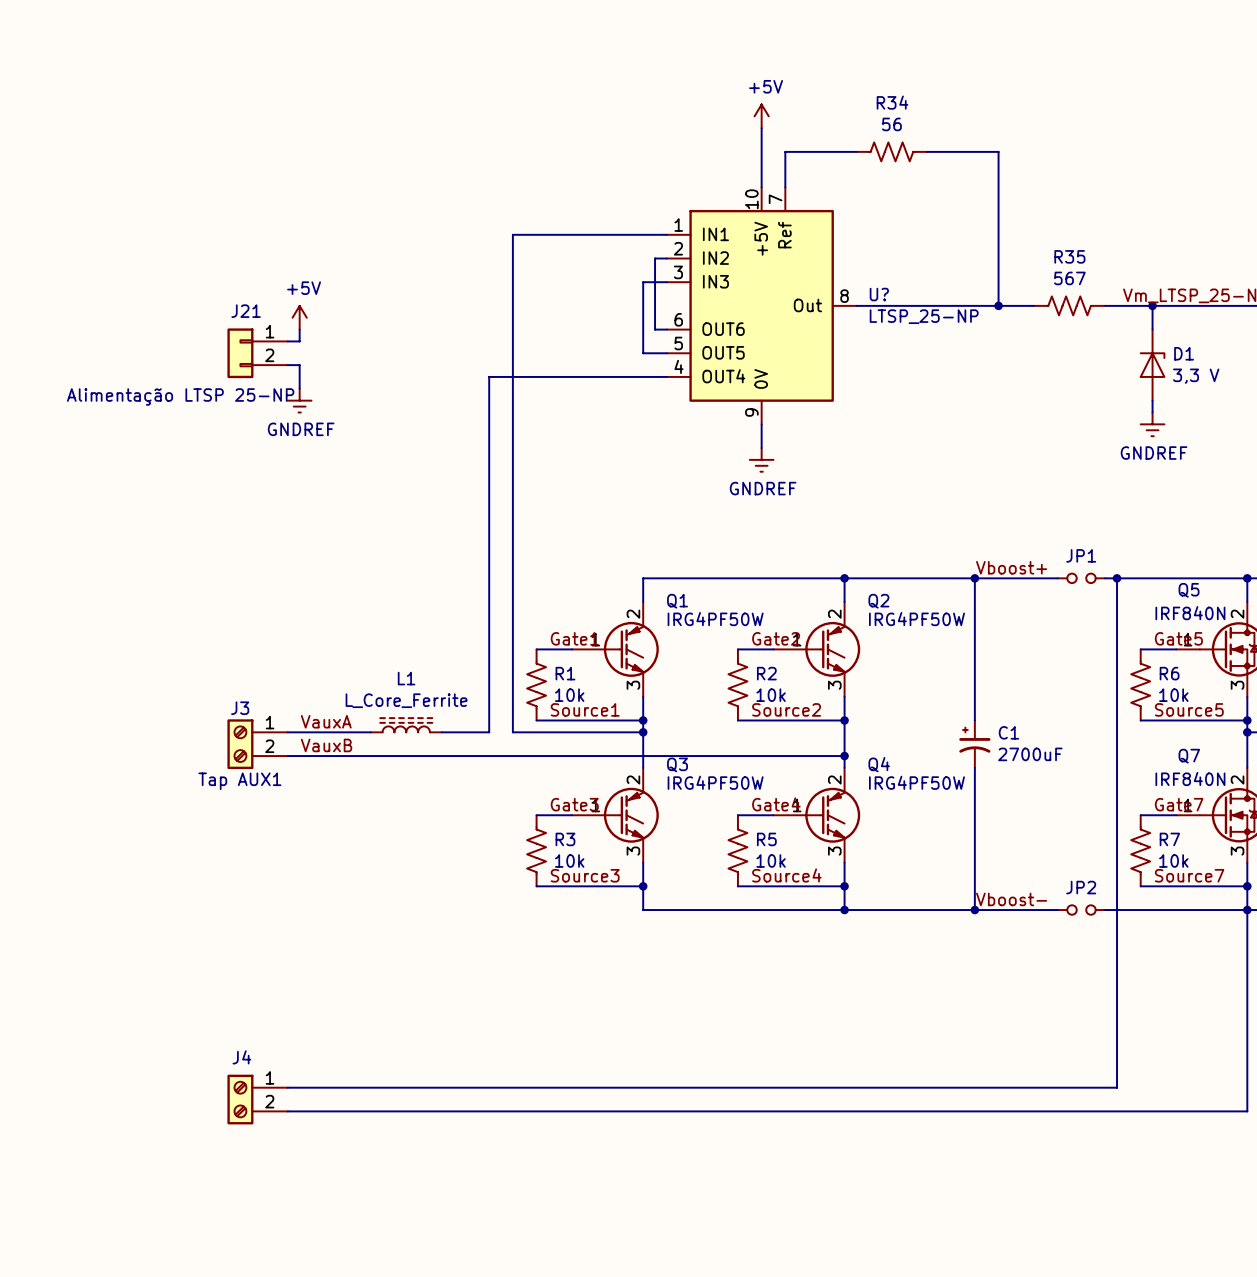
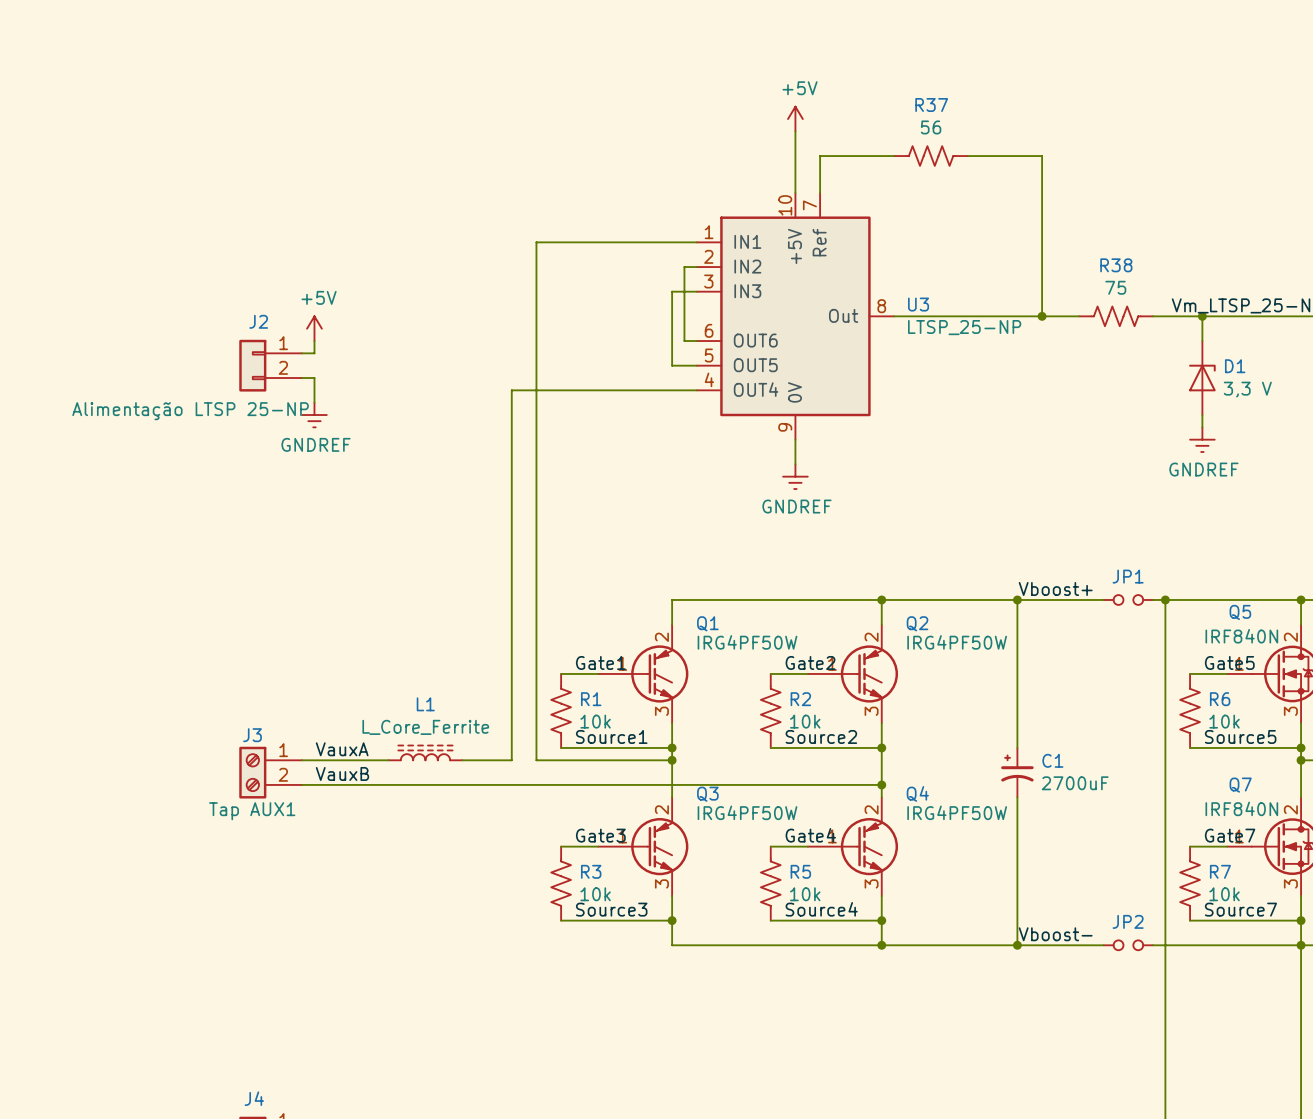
R34 name: R34 (892, 102) -> R37 (931, 105)
R35 name: R35 (1069, 256) -> R38 (1116, 265)
R35 value: 567 (1069, 278) -> 75 (1115, 287)
U? name: U? (879, 294) -> U3 (918, 304)
J21 name: J21 (246, 311) -> J2 (258, 321)

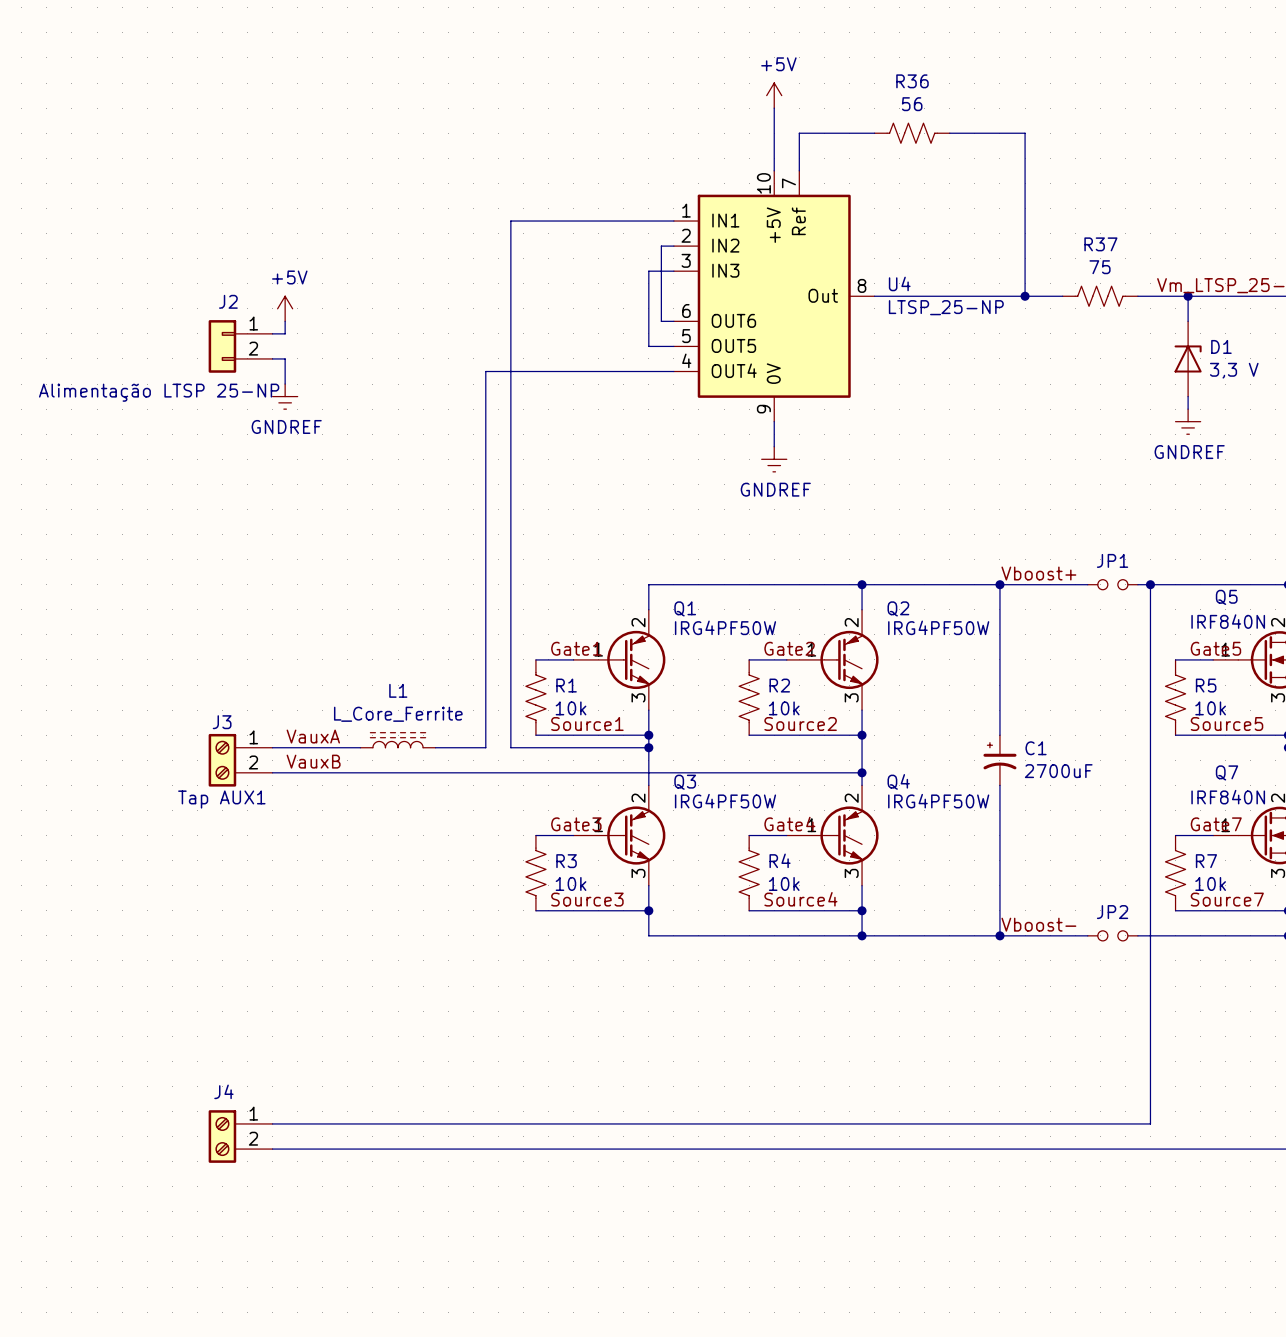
R37 name: R37 (931, 105) -> R36 (912, 81)
R38 name: R38 (1116, 265) -> R37 (1100, 244)
U3 name: U3 (918, 304) -> U4 (899, 283)
R6 name: R6 (1220, 699) -> R5 (1206, 685)
R5 name: R5 (800, 871) -> R4 (780, 860)

